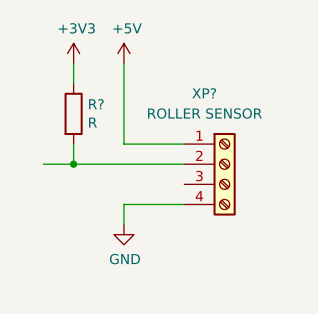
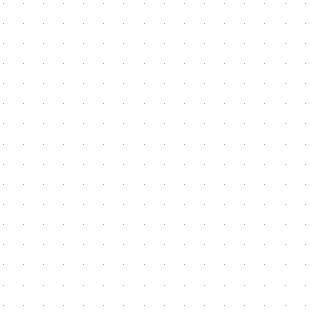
power symbol: +3V3 (73, 53) -> none
power symbol: +5V (123, 53) -> none
wire: (73, 63) (73, 83) -> none
wire: (123, 63) (123, 144) (184, 144) -> none
R?: R (73, 113) -> none
wire: (73, 144) (73, 164) -> none
wire: (43, 164) (184, 164) -> none
junction: (73, 164) -> none
XP?: ROLLER SENSOR (210, 174) -> none
wire: (184, 204) (123, 204) (123, 224) -> none
power symbol: GND (123, 234) -> none

